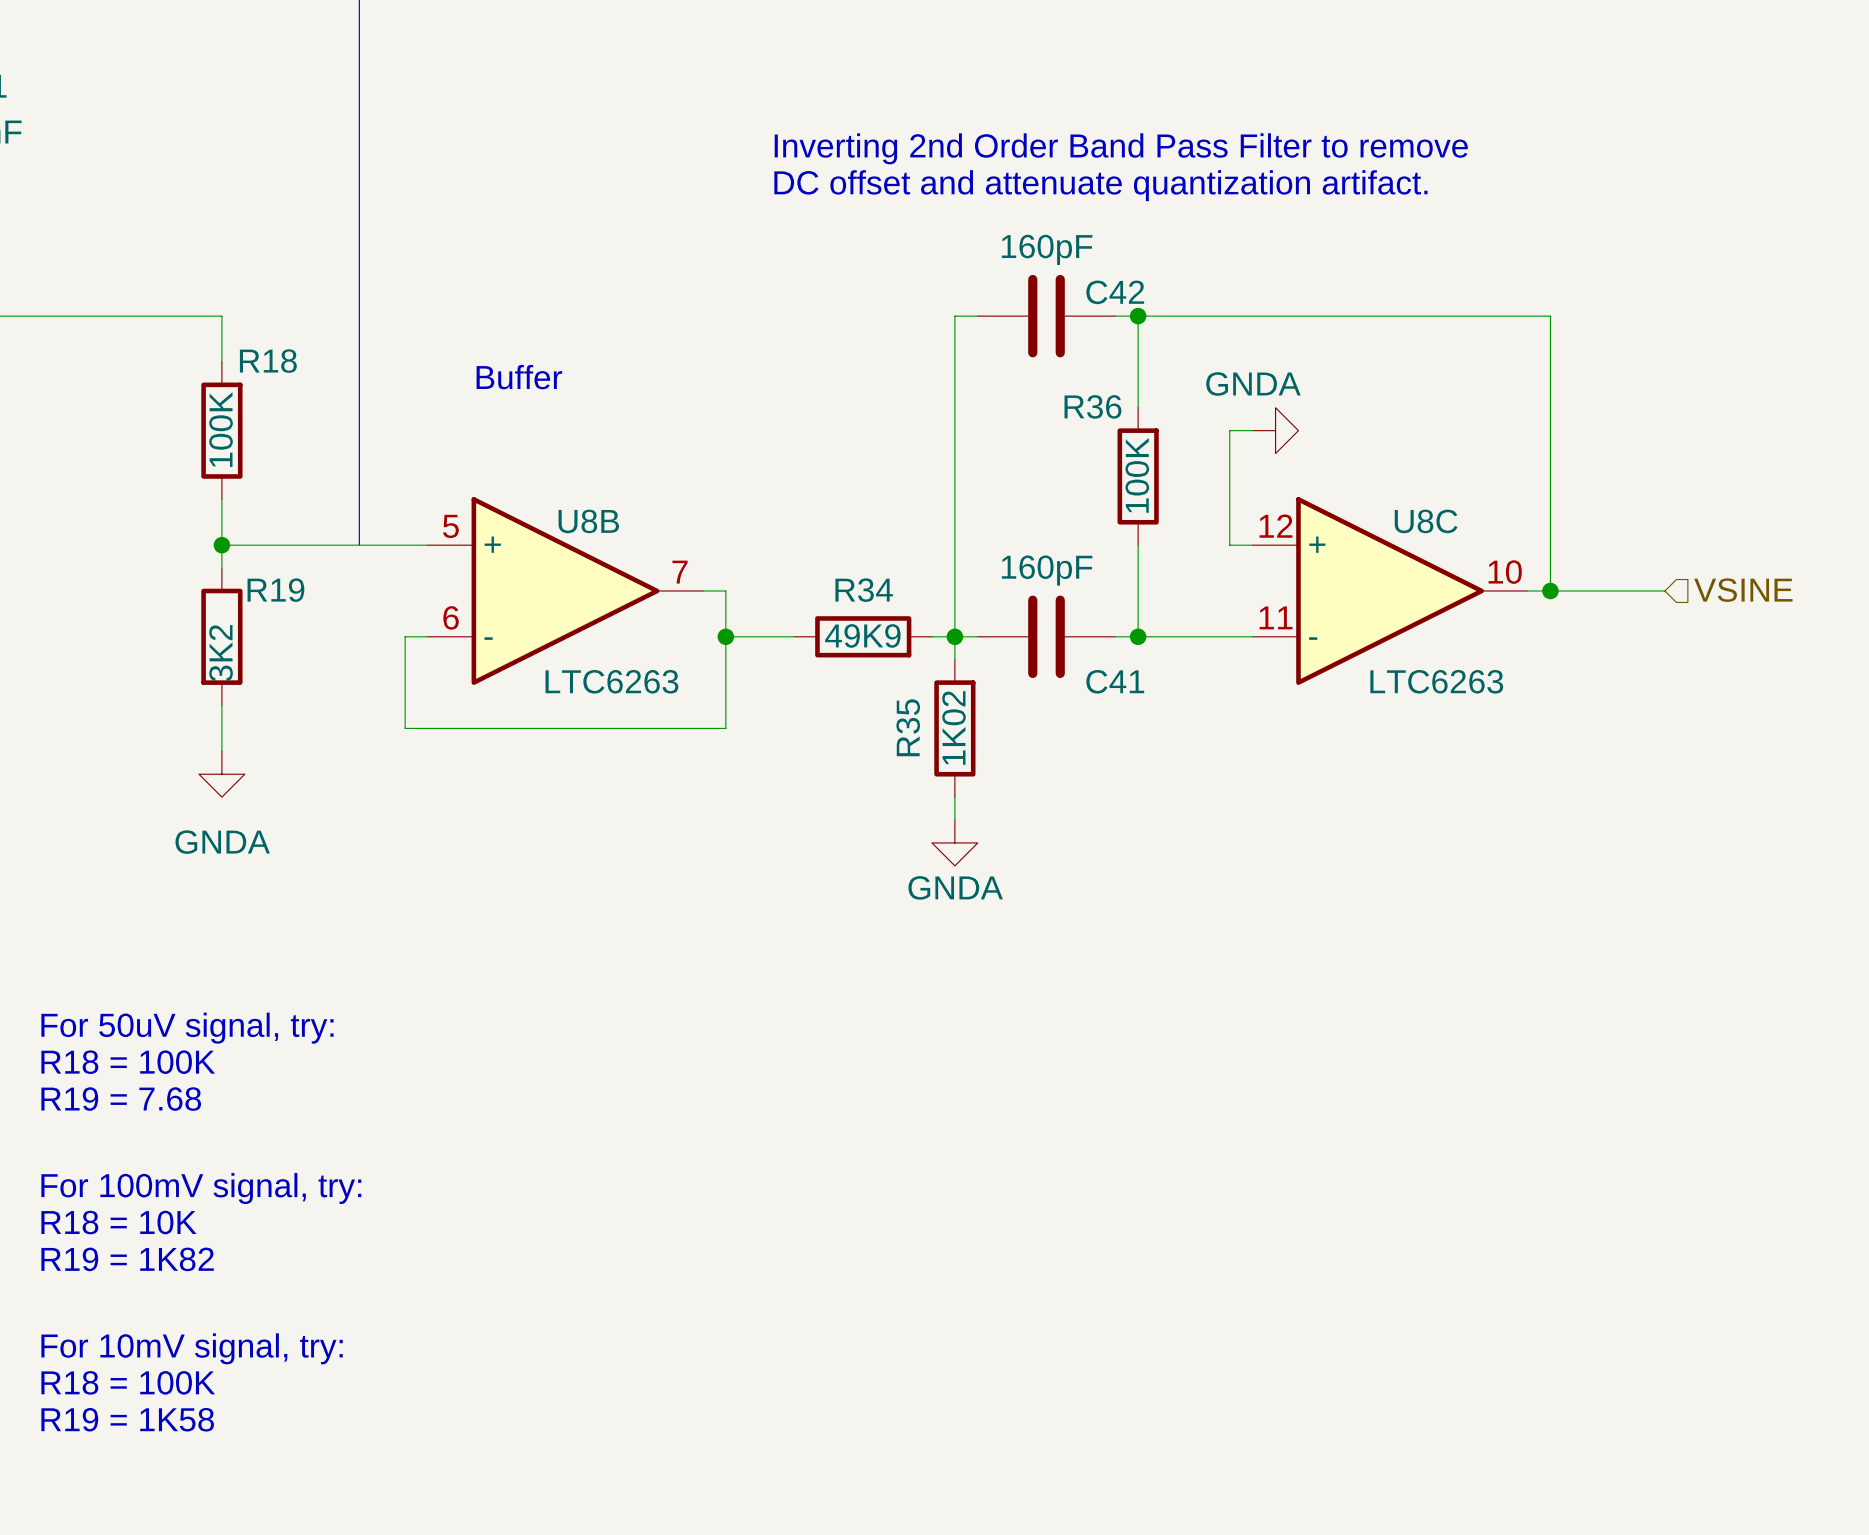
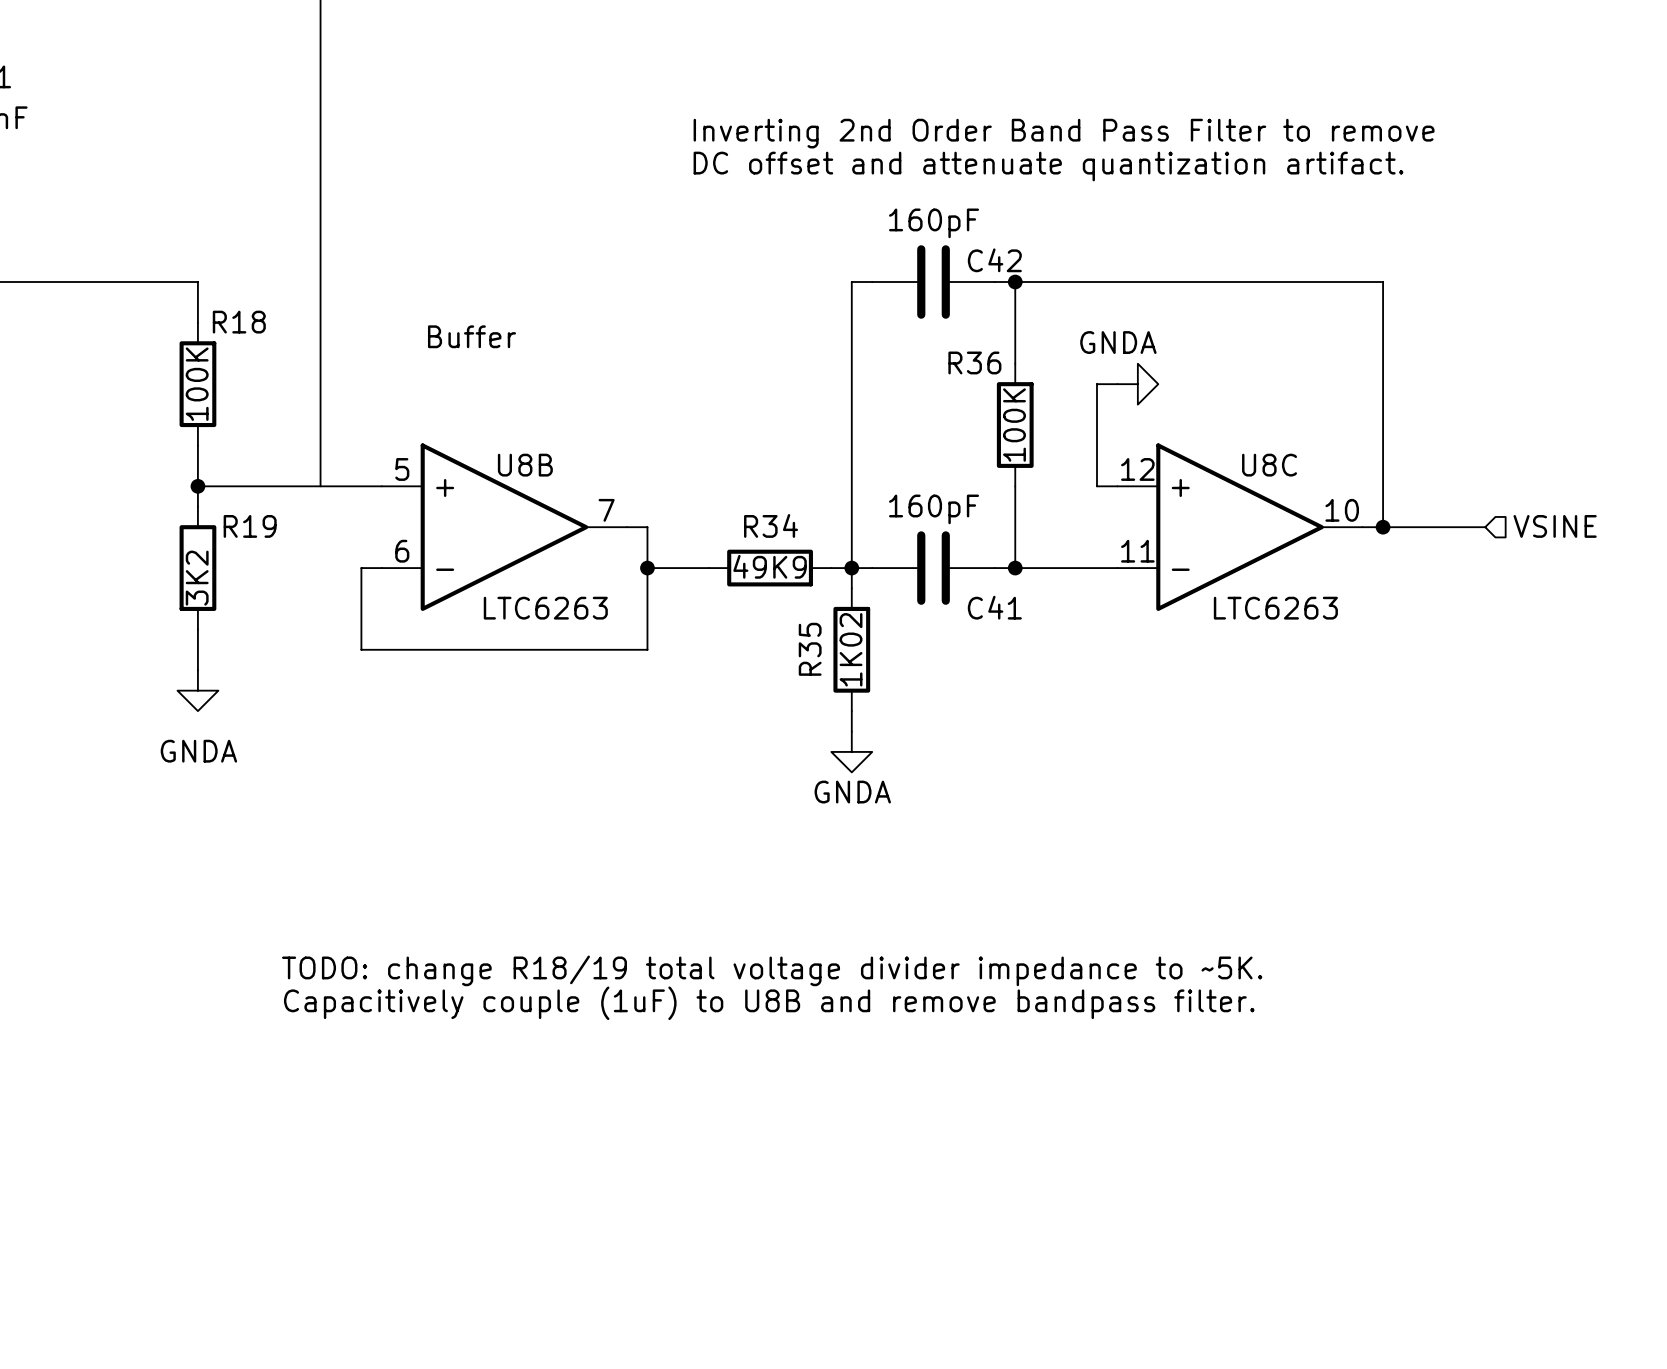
text: For 50uV signal, try: (187, 1028) -> none
text: R18 = 100K (128, 1062) -> none
text: none -> TODO: change R18/19 total voltage divider impedance to ~5K. (772, 970)
text: R19 = 7.68 (121, 1099) -> none
text: none -> Capacitively couple (1uF) to U8B and remove bandpass filter. (769, 1003)
text: For 100mV signal, try: (201, 1188) -> none
text: R18 = 10K (118, 1222) -> none
text: R19 = 1K82 (127, 1259) -> none
text: For 10mV signal, try: (192, 1348) -> none
text: R18 = 100K (128, 1382) -> none
text: R19 = 1K58 (127, 1419) -> none

